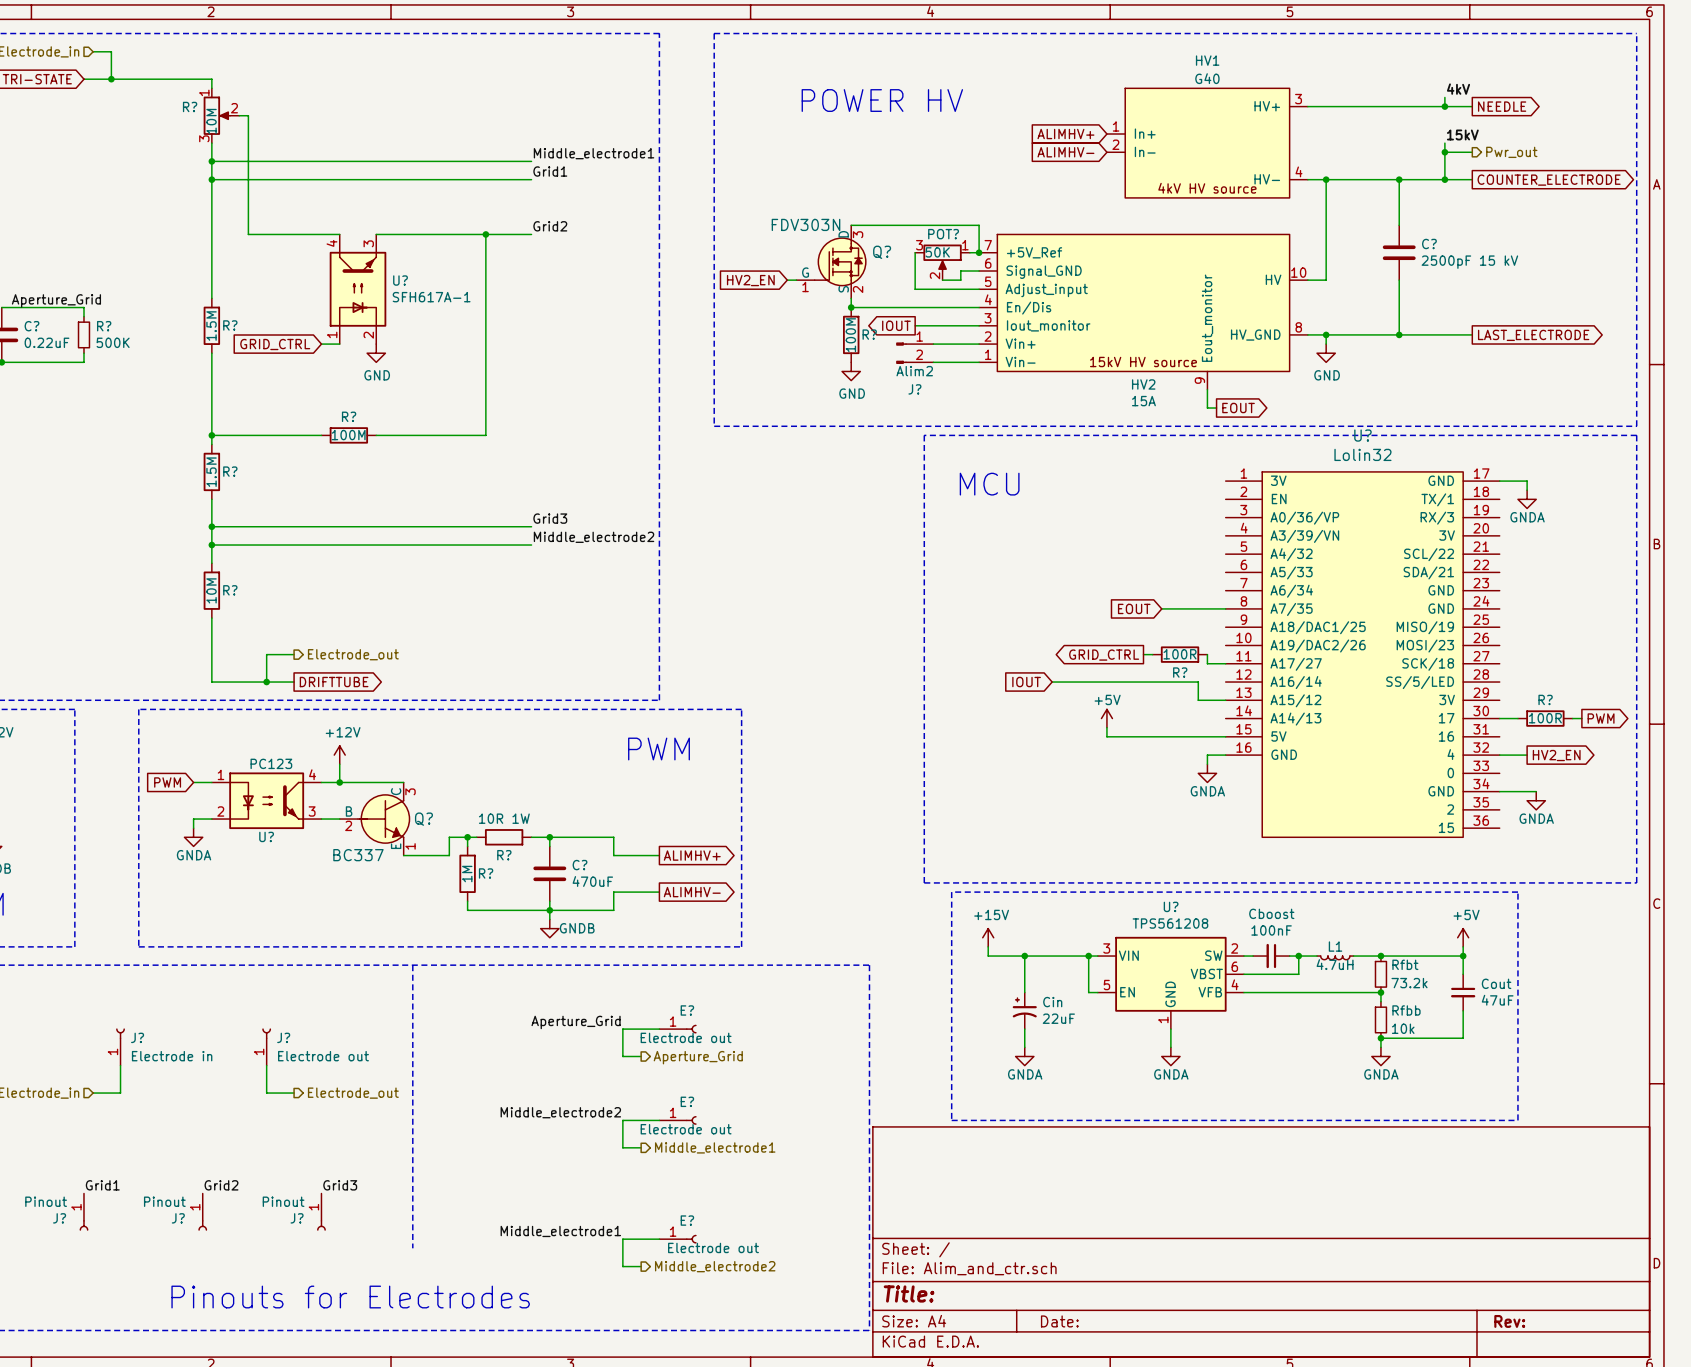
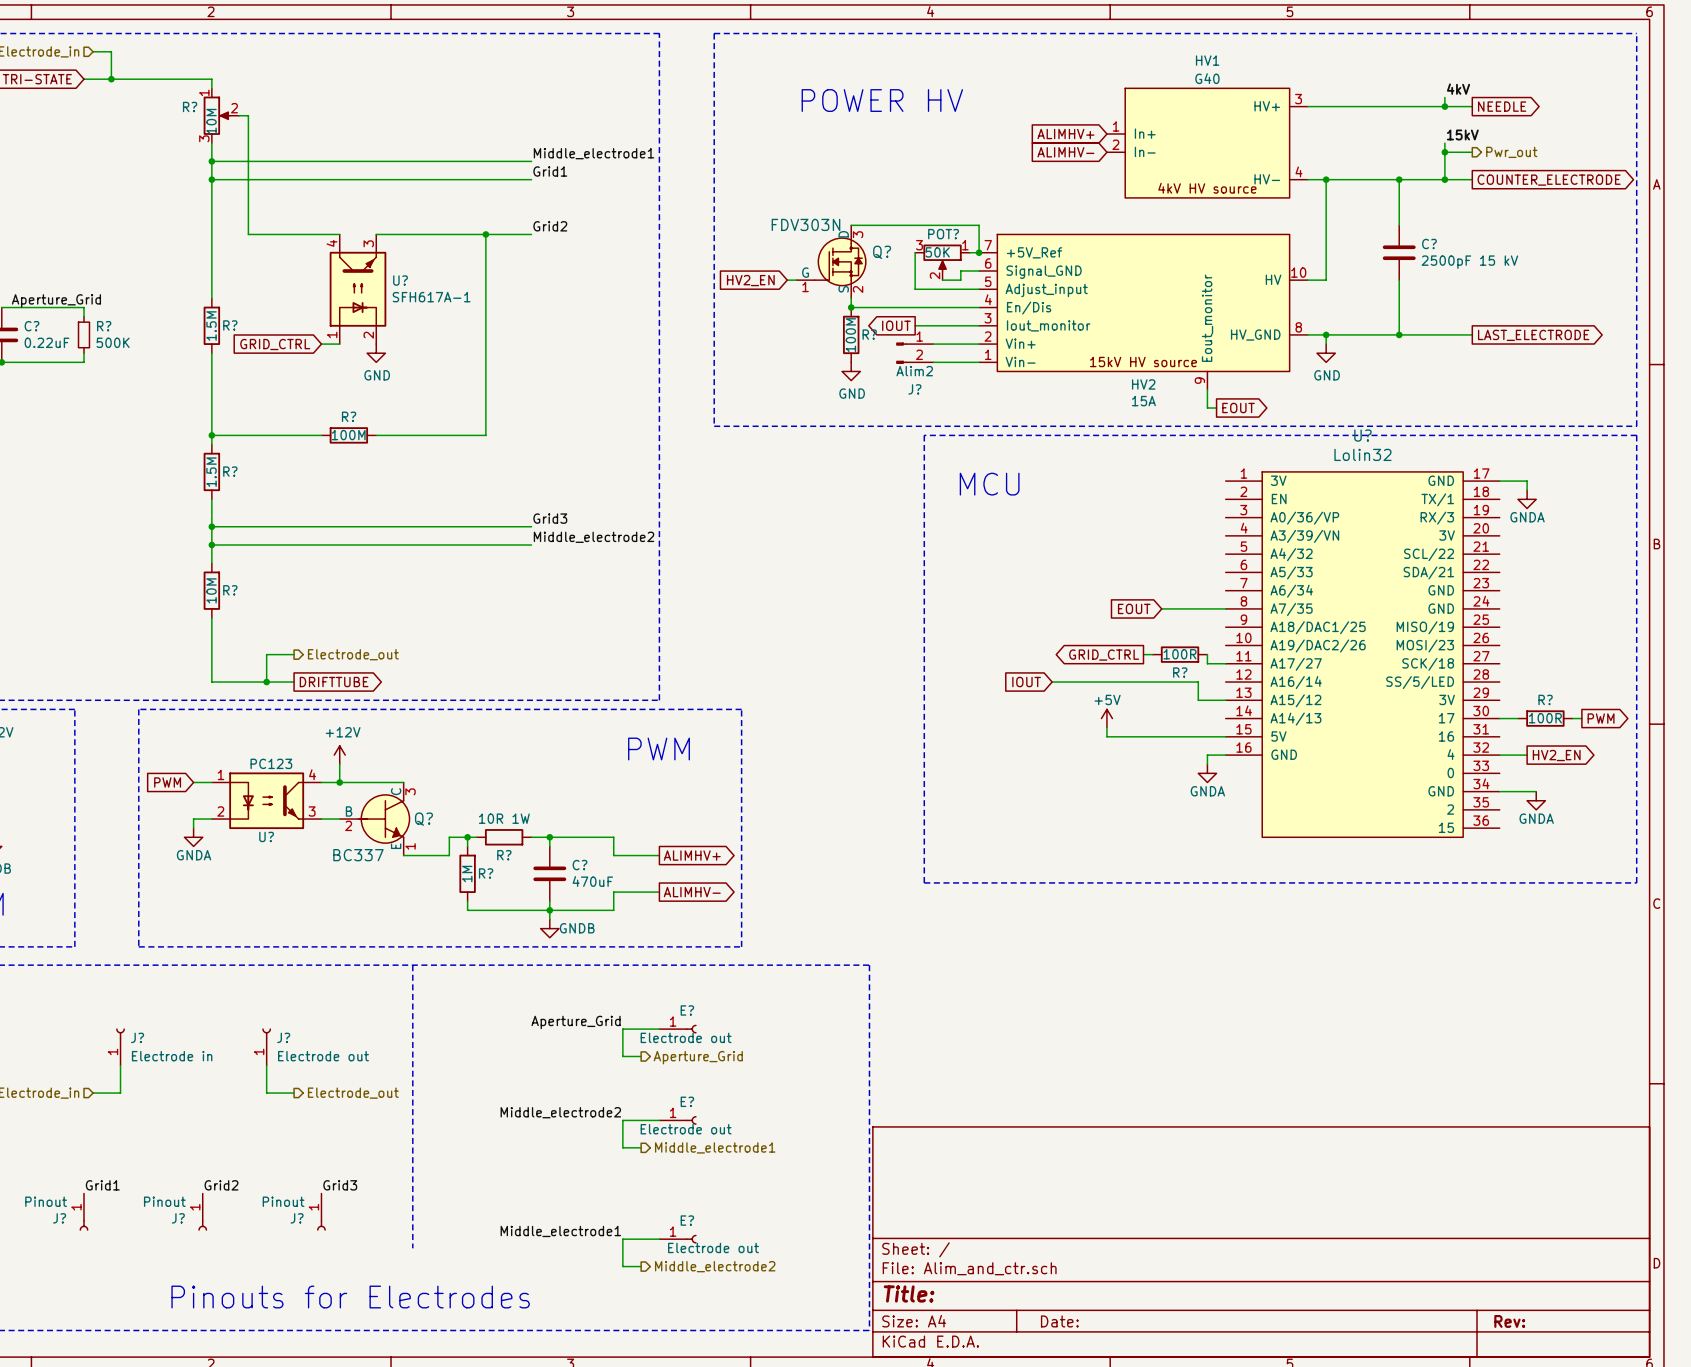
line: (951, 892) (951, 1120) (1517, 1120) (1517, 892) (951, 892) -> none
power symbol: +15V (988, 937) -> none
power symbol: +5V (1463, 937) -> none
wire: (988, 946) (988, 956) (1097, 956) -> none
wire: (1463, 946) (1463, 974) -> none
wire: (1024, 956) (1024, 992) -> none
junction: (1024, 956) -> none
wire: (1088, 956) (1088, 992) (1097, 992) -> none
junction: (1088, 956) -> none
wire: (1243, 956) (1253, 956) -> none
Cboost: 100nF (1271, 956) -> none
wire: (1289, 956) (1317, 956) -> none
wire: (1298, 956) (1298, 974) (1243, 974) -> none
junction: (1298, 956) -> none
wire: (1353, 956) (1463, 956) -> none
junction: (1380, 956) -> none
junction: (1463, 956) -> none
L1: 4.7uH (1335, 957) -> none
Rfbt: 73.2k (1380, 974) -> none
U?: TPS561208 (1170, 982) -> none
wire: (1243, 992) (1380, 992) (1380, 1001) -> none
junction: (1380, 992) -> none
Cout: 47uF (1463, 992) -> none
Cin: 22uF (1024, 1010) -> none
wire: (1463, 1010) (1463, 1038) (1380, 1038) (1380, 1047) -> none
Rfbb: 10k (1380, 1019) -> none
wire: (1024, 1029) (1024, 1047) -> none
wire: (1170, 1029) (1170, 1047) -> none
junction: (1380, 1038) -> none
power symbol: GNDA (1024, 1056) -> none
power symbol: GNDA (1170, 1056) -> none
power symbol: GNDA (1380, 1056) -> none

